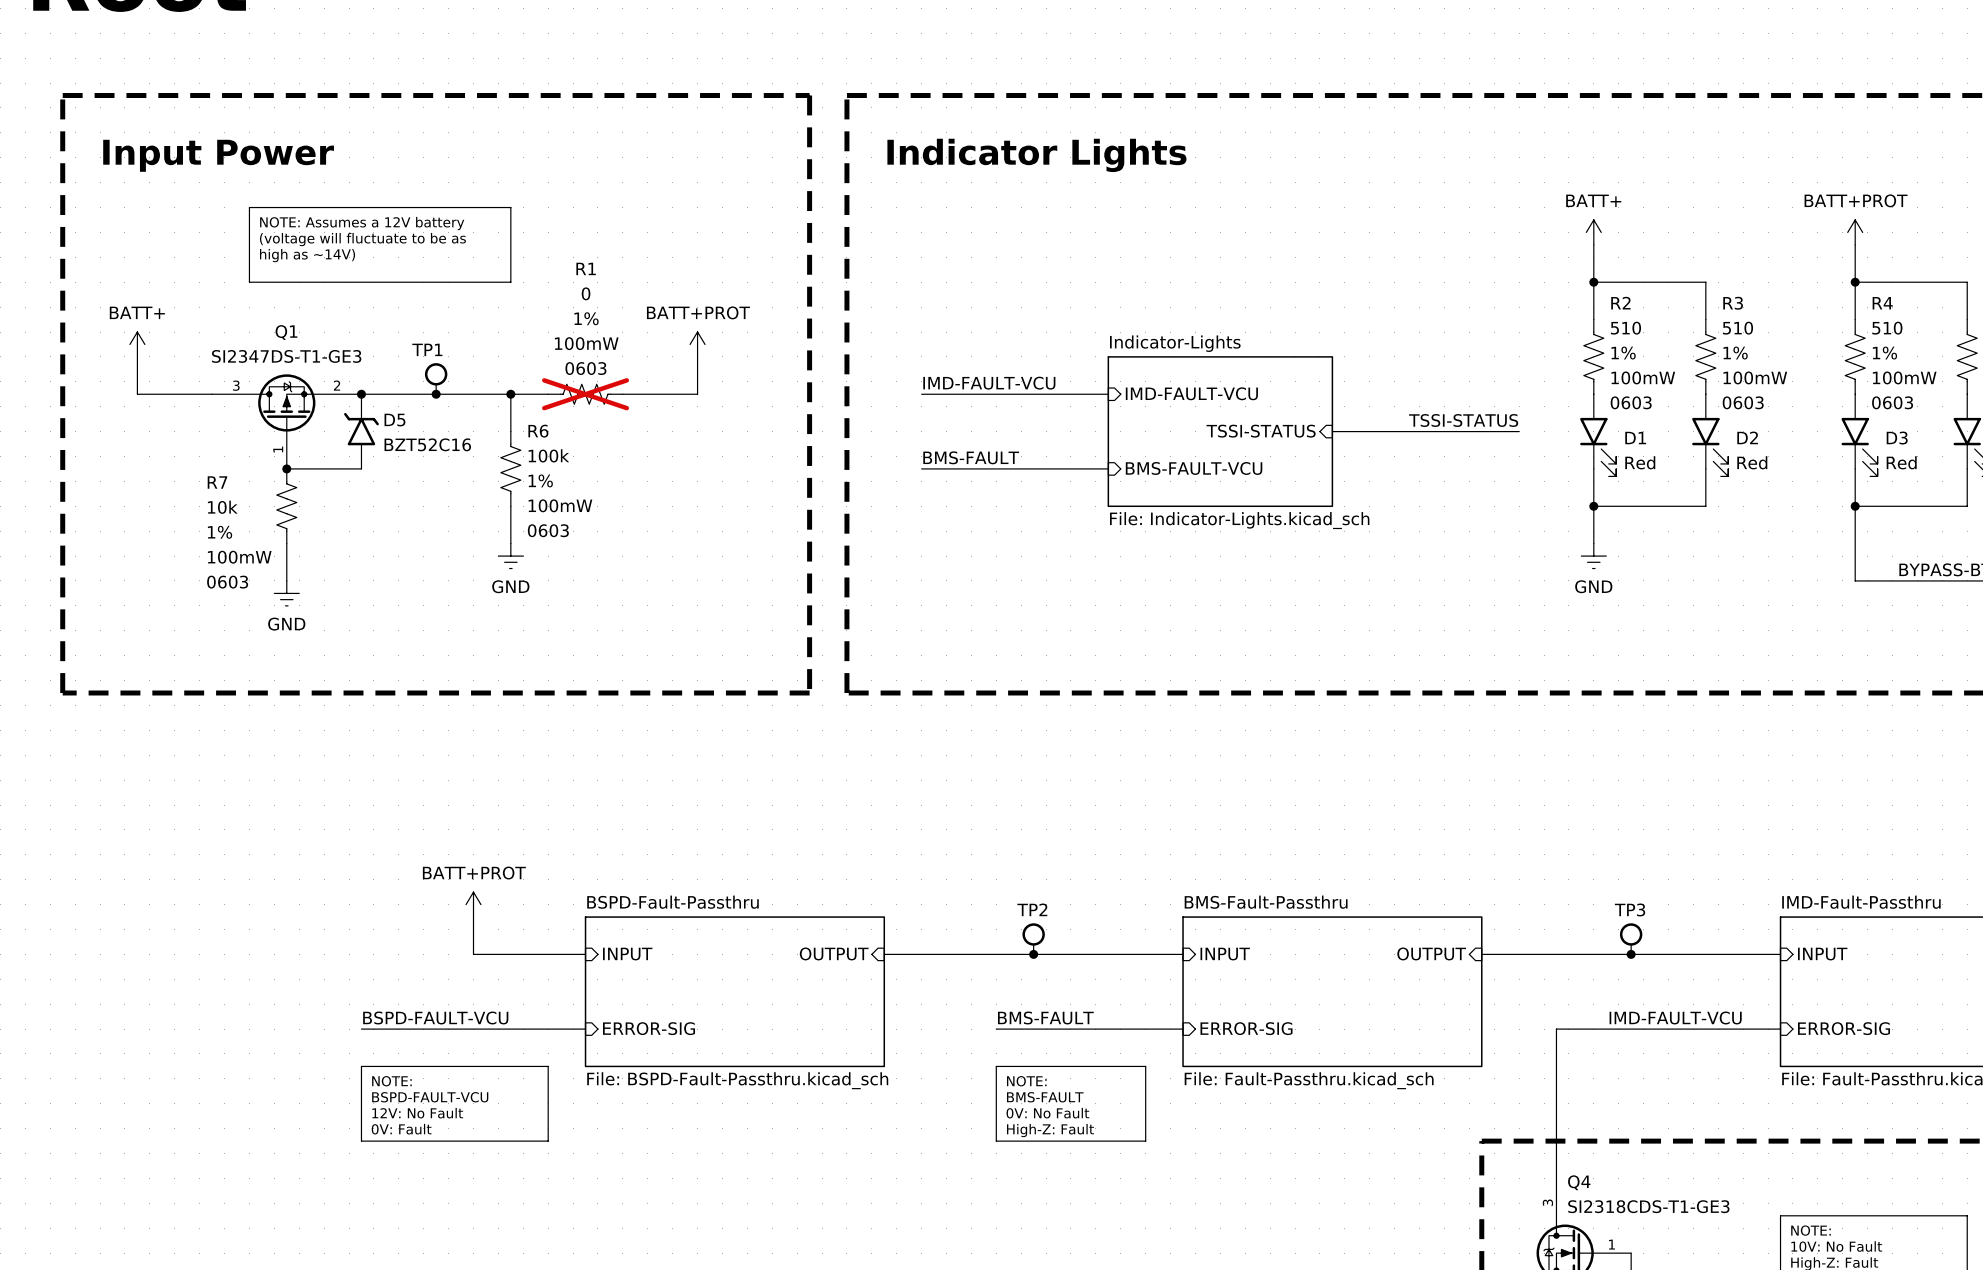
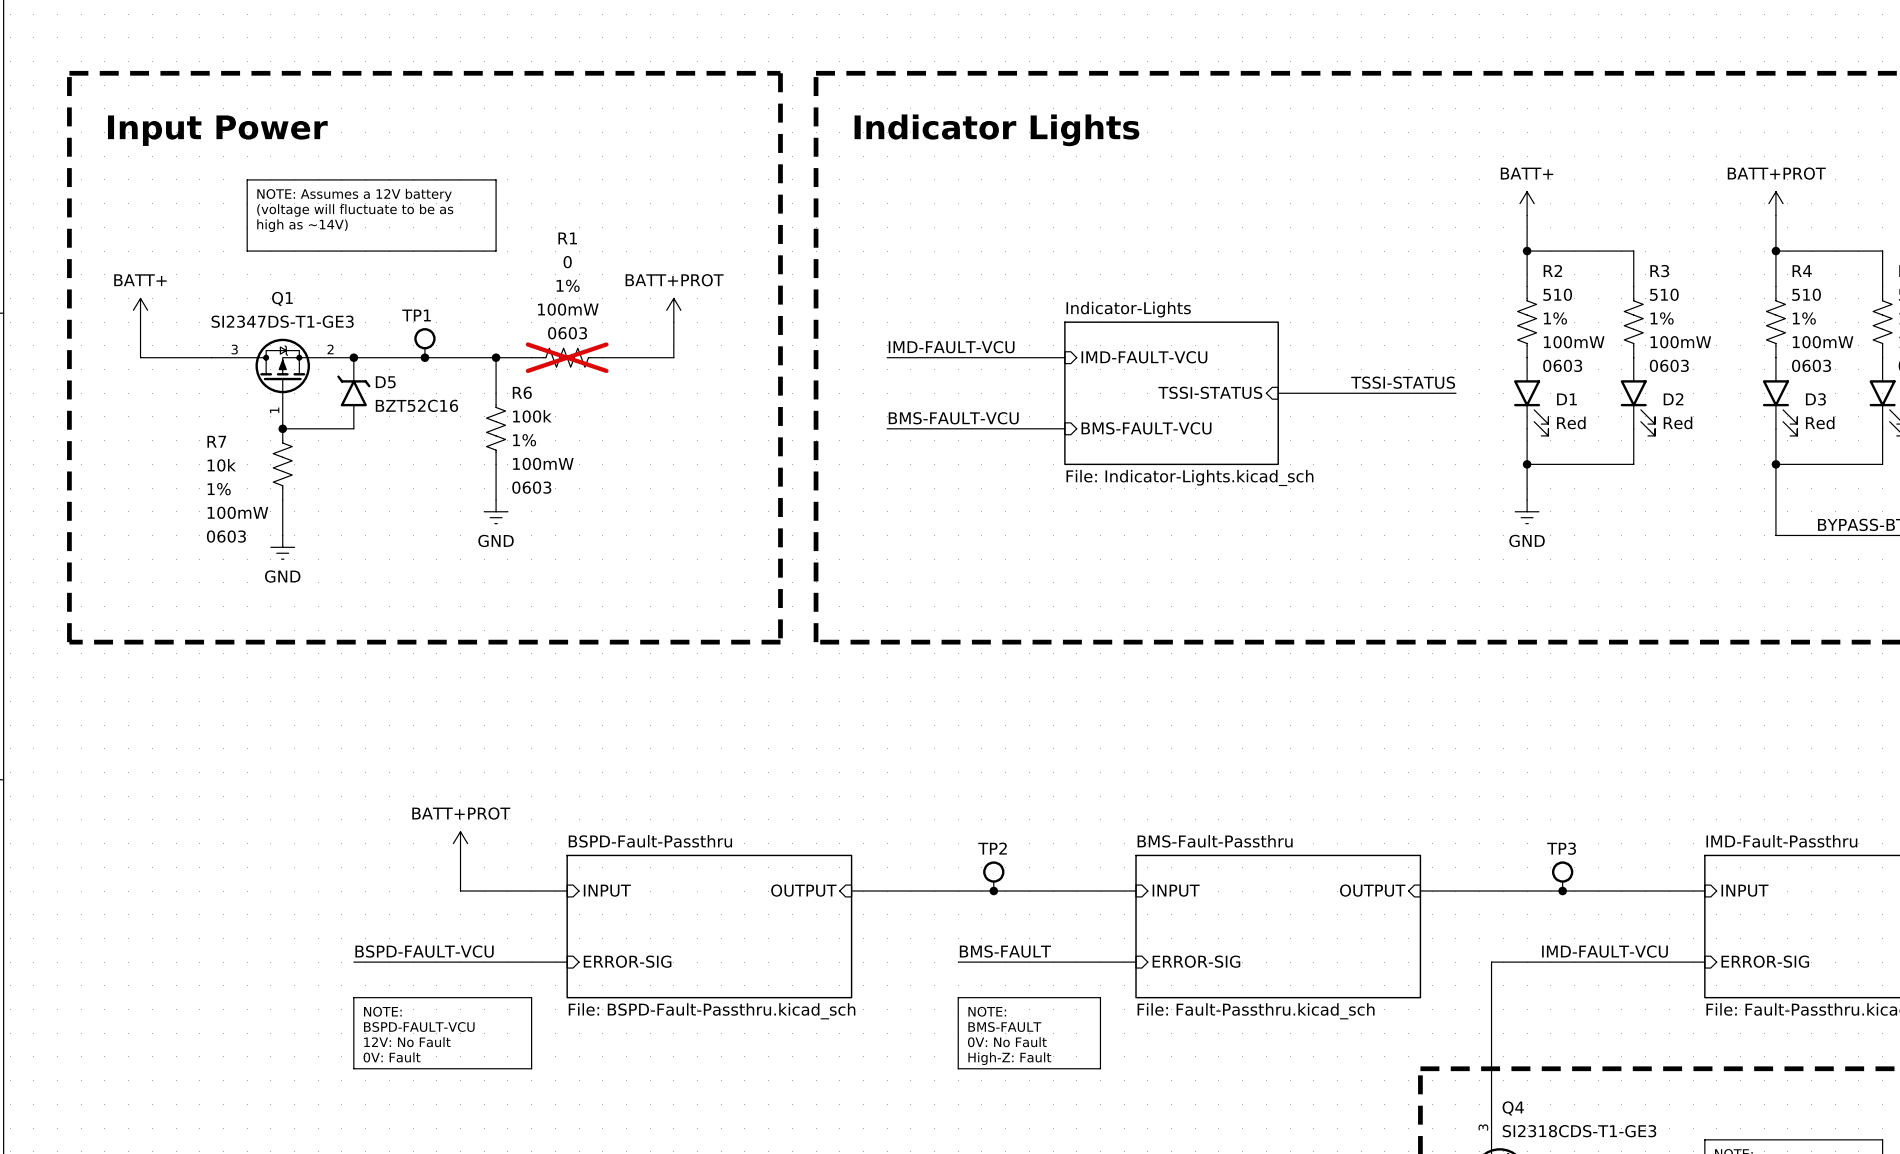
label: BMS-FAULT (971, 457) -> BMS-FAULT-VCU (953, 418)

